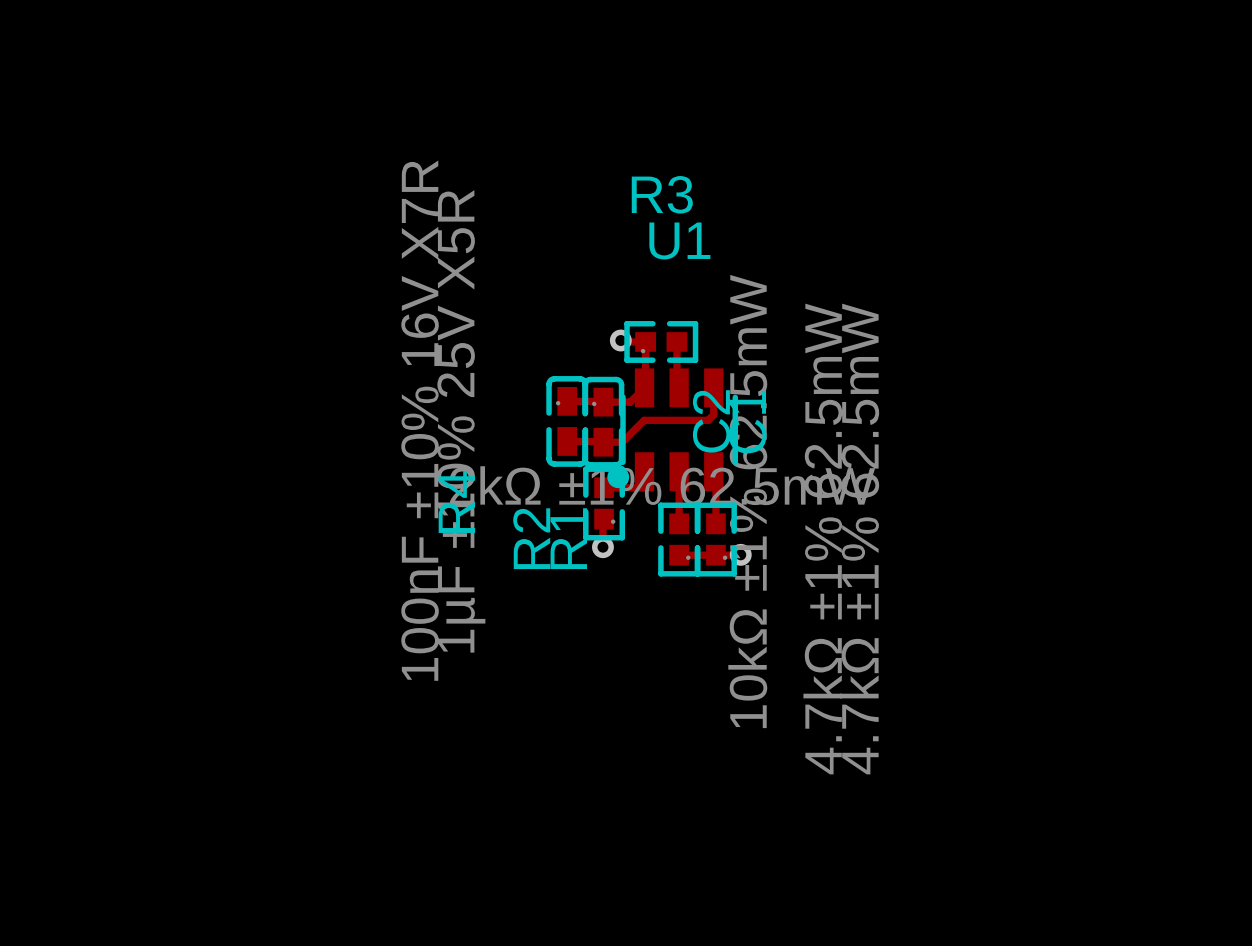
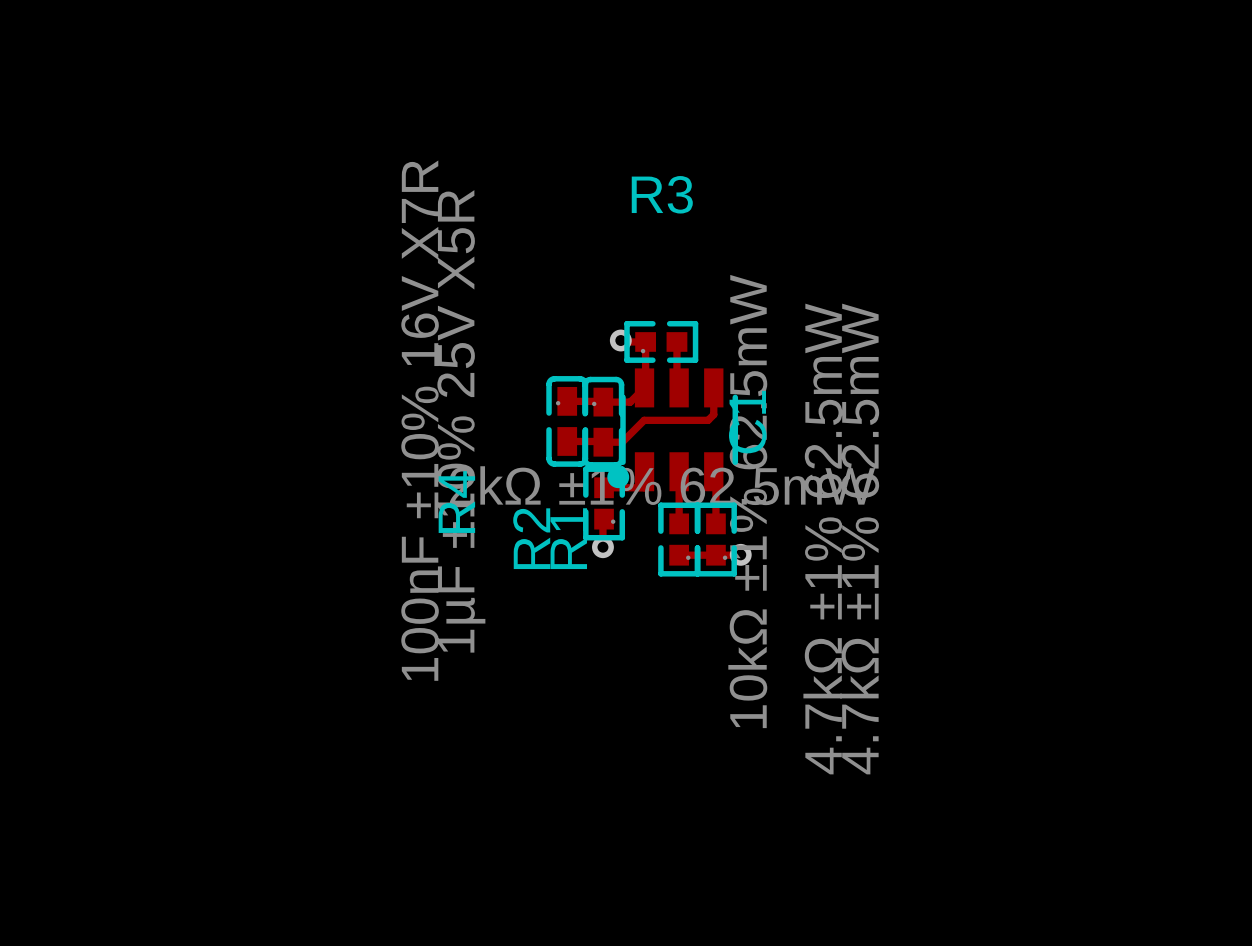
U1 name: U1 (679, 240) -> none
C2 name: C2 (711, 421) -> none

